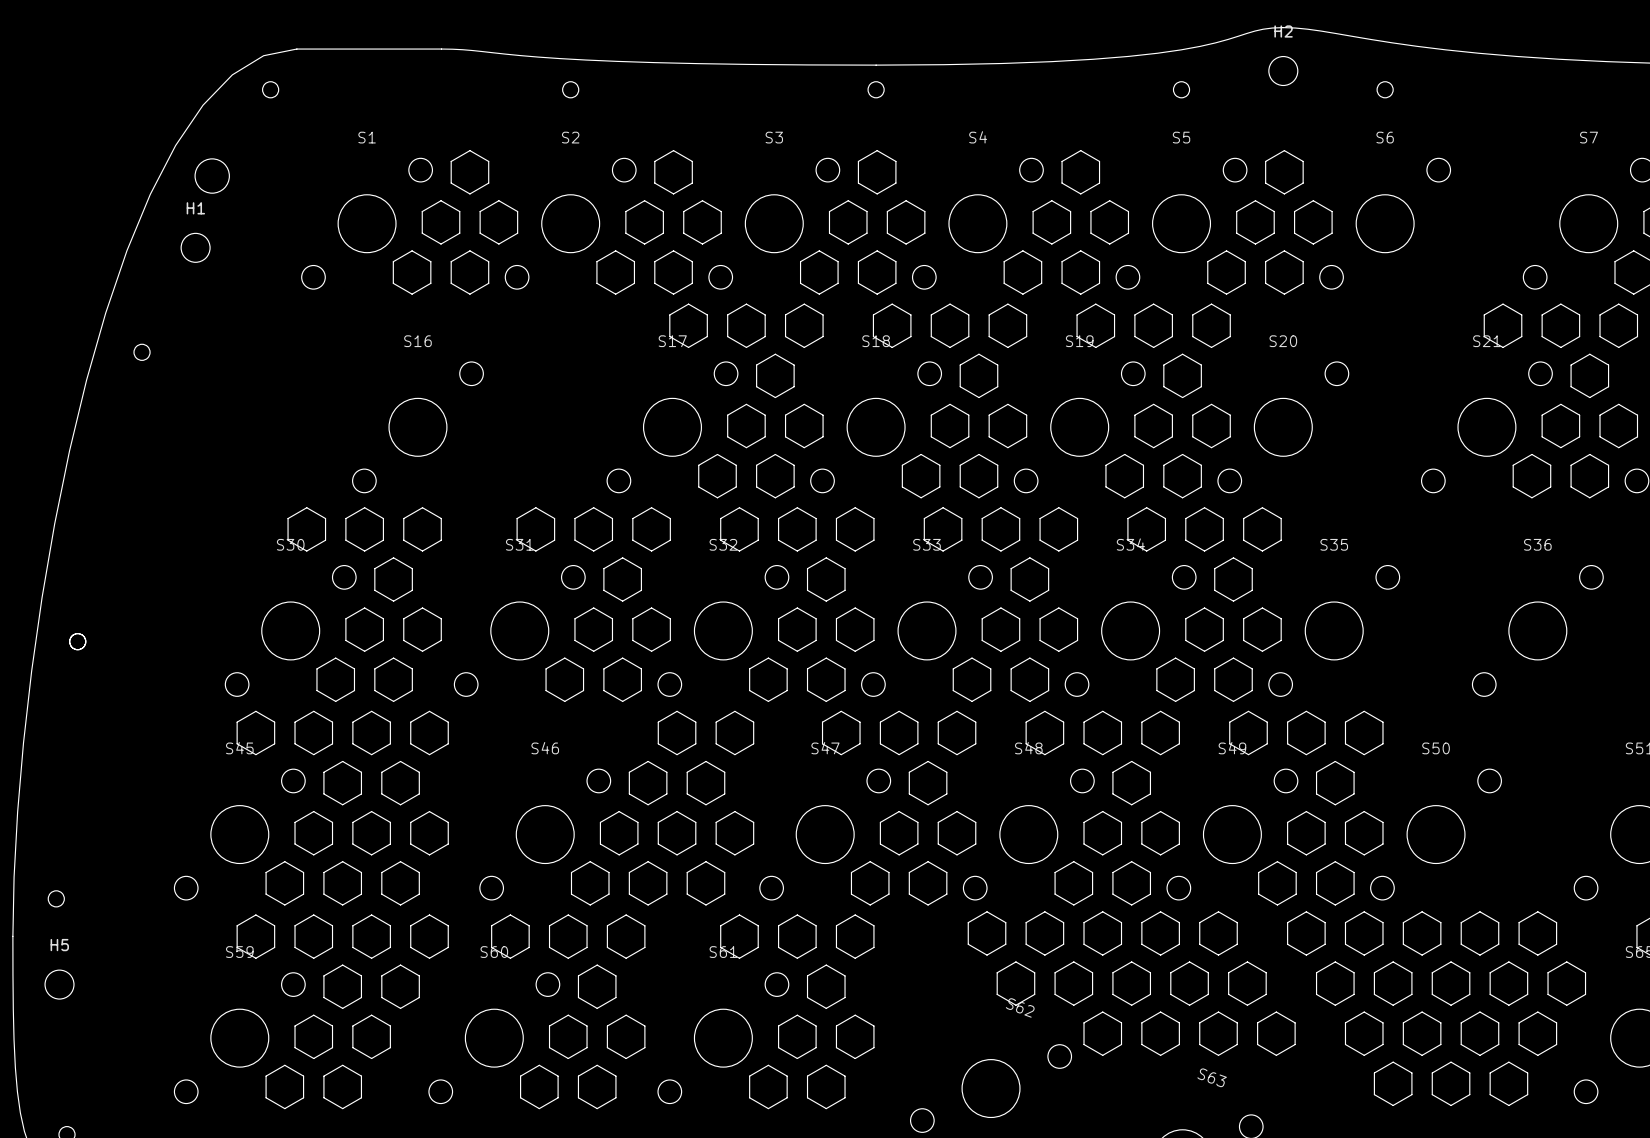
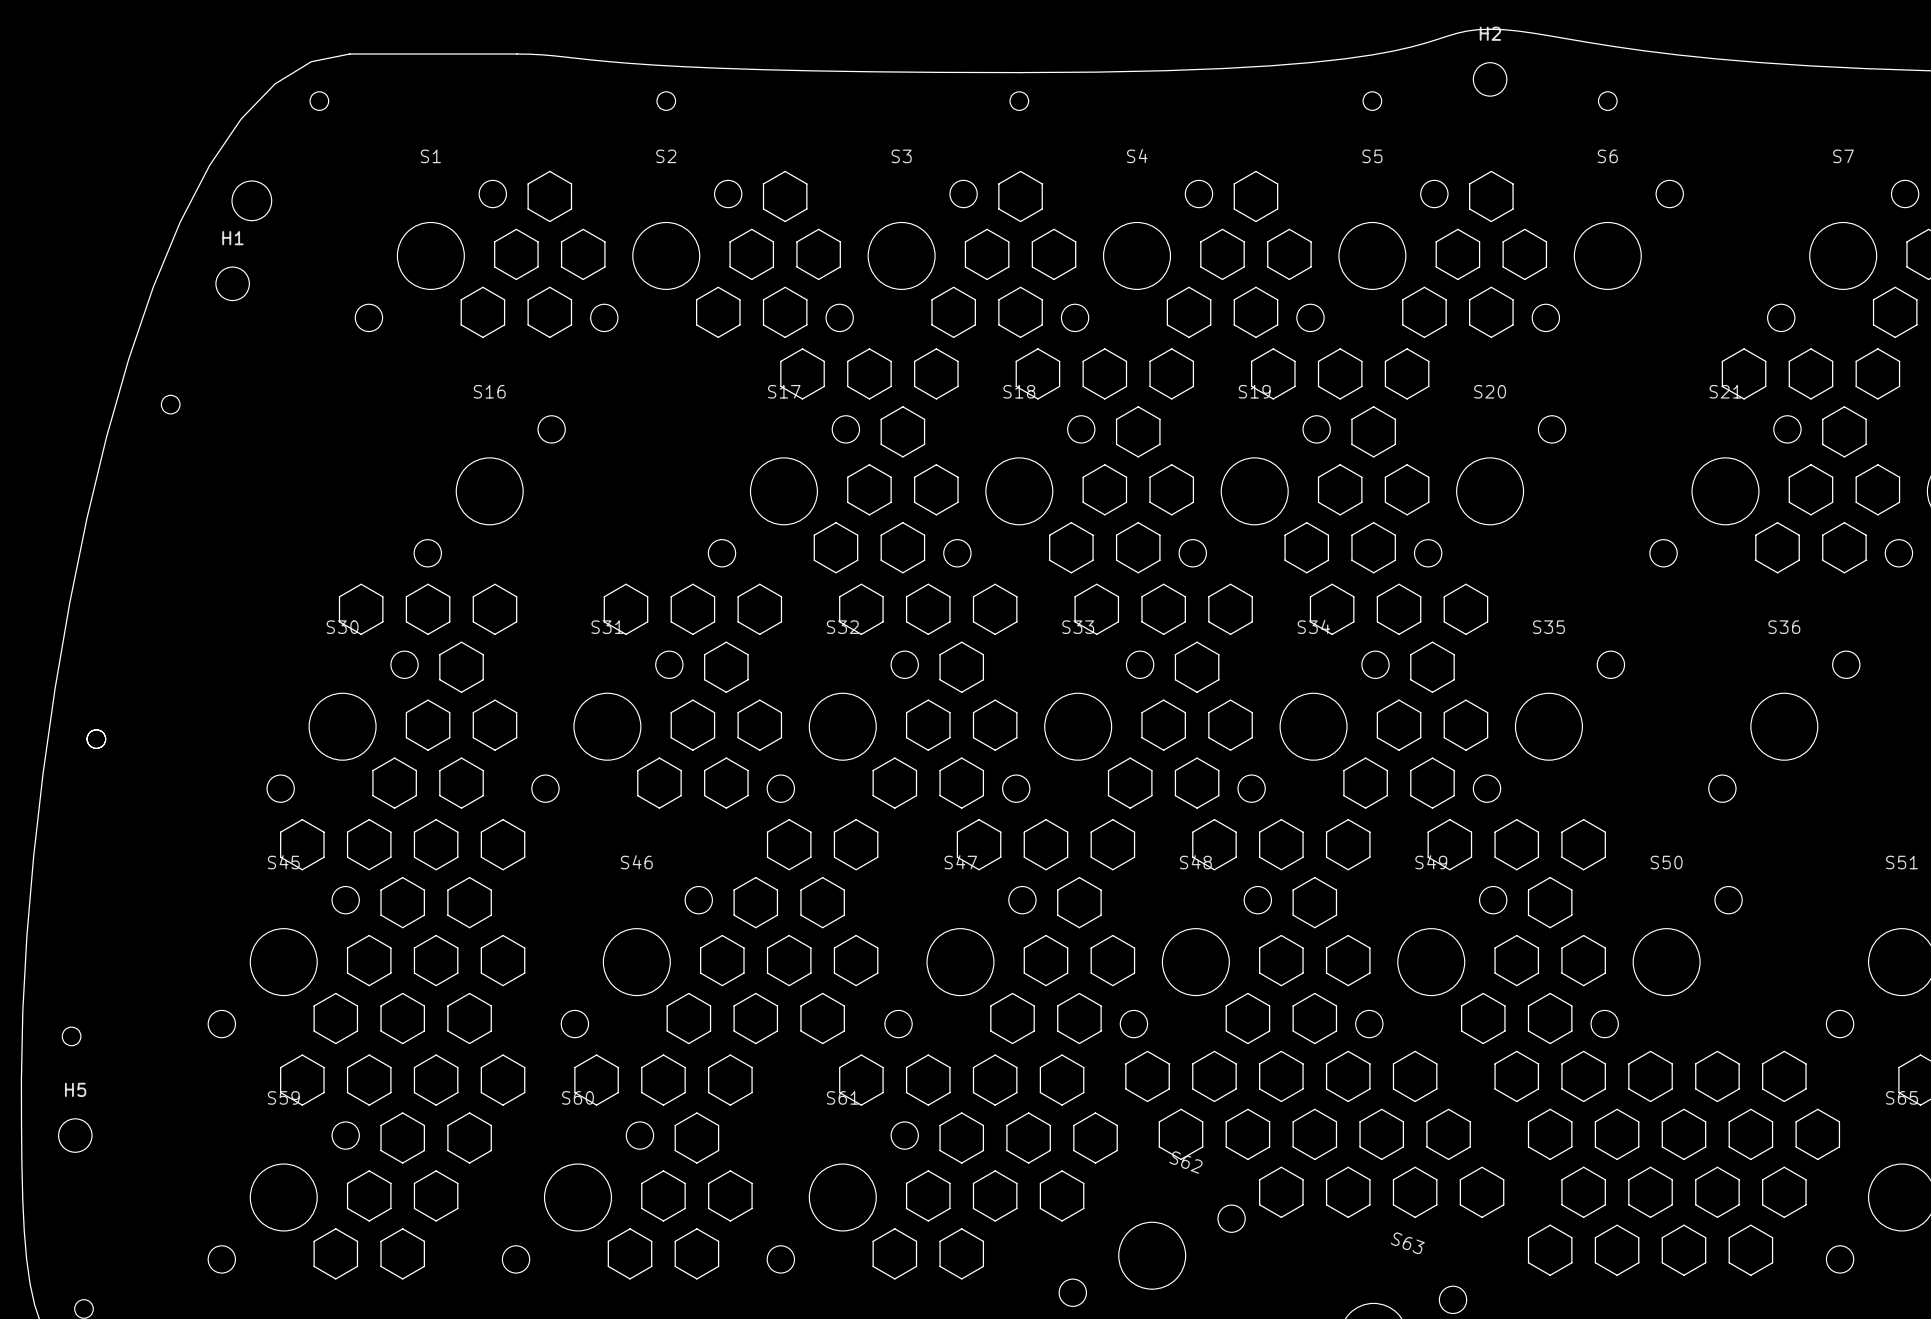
board edge: none -> (1062, 1055) (1083, 1067) (1083, 1092) (1062, 1105) (1040, 1092) (1040, 1067) (1062, 1055)
board edge: none -> (1028, 1112) (1050, 1125) (1050, 1150) (1028, 1163) (1006, 1150) (1006, 1125) (1028, 1112)
board edge: none -> (1095, 1112) (1073, 1125) (1073, 1150) (1095, 1163) (1117, 1150) (1117, 1125) (1095, 1112)
board edge: none -> (1062, 1170) (1040, 1183) (1040, 1208) (1062, 1220) (1083, 1208) (1083, 1183) (1062, 1170)
board edge: none -> (1550, 1225) (1571, 1237) (1571, 1262) (1550, 1275) (1528, 1262) (1528, 1237) (1550, 1225)

